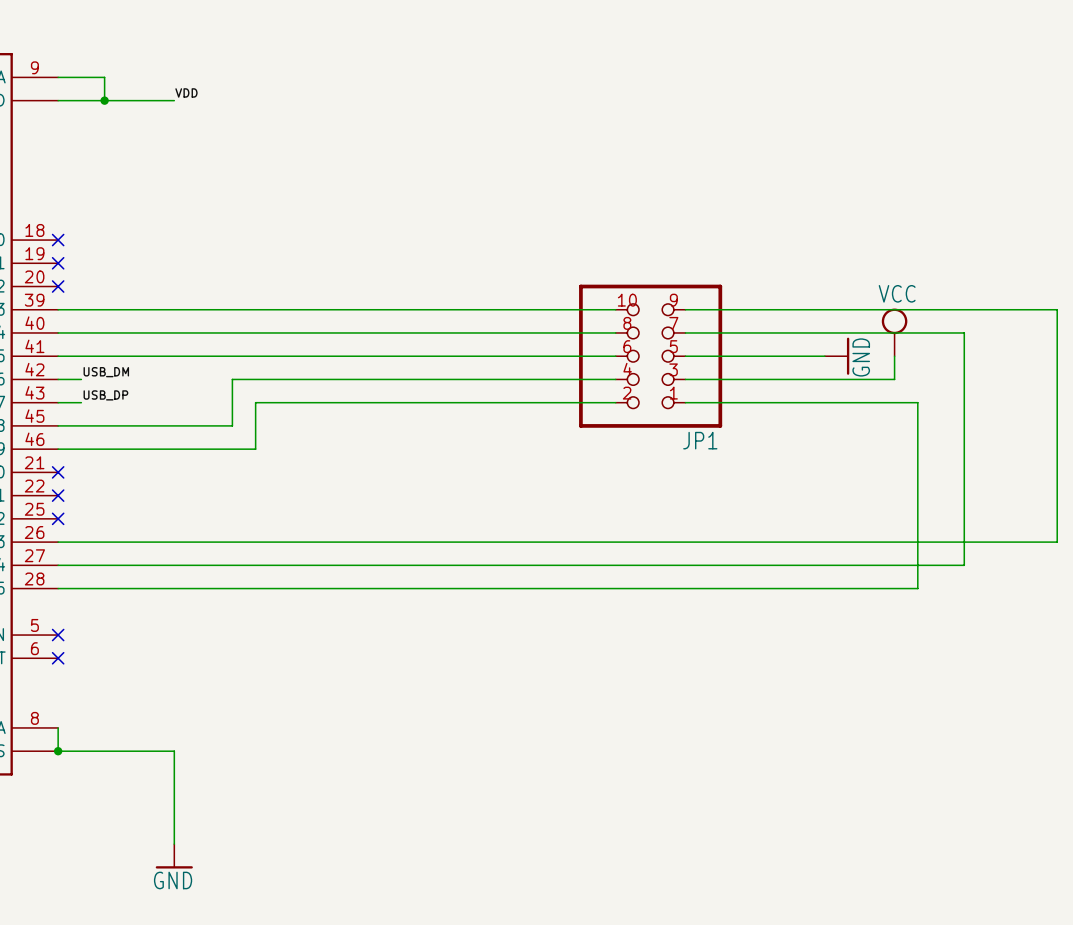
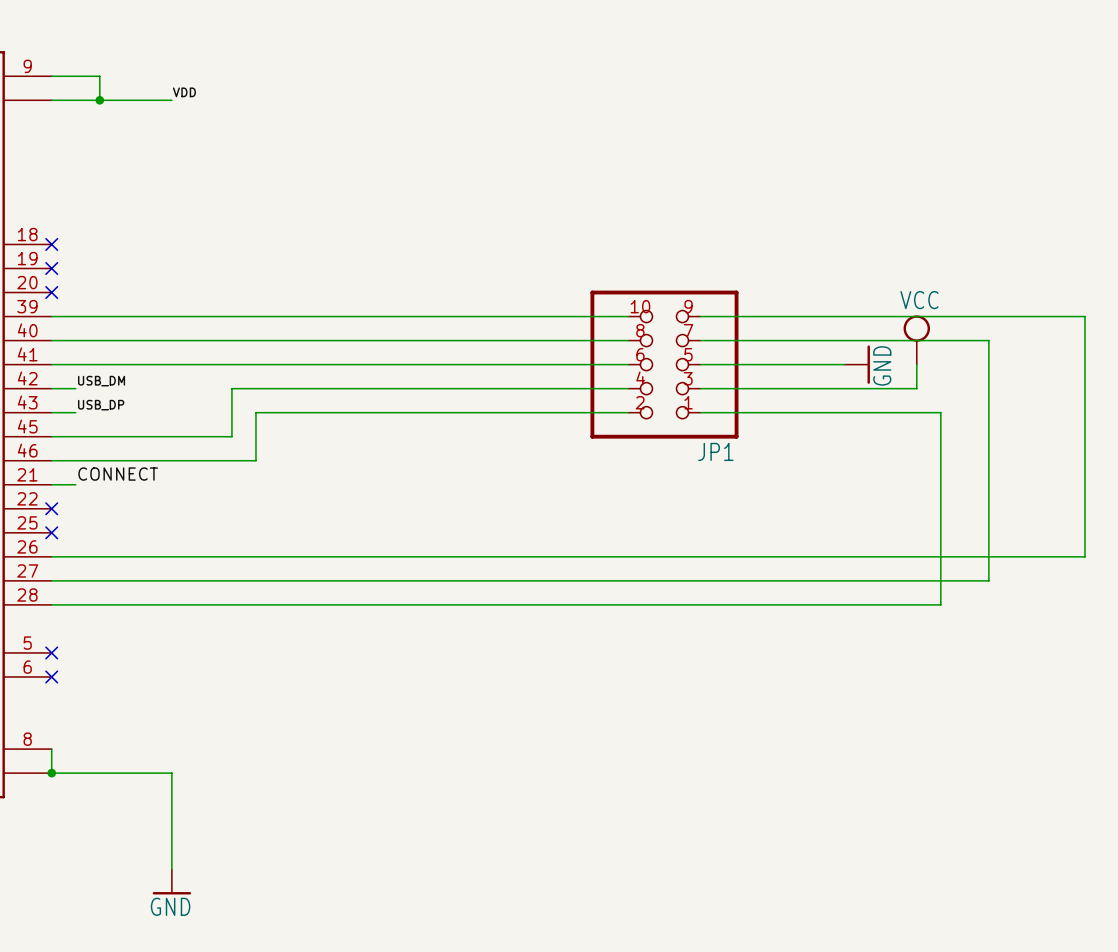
label: none -> CONNECT (118, 474)
wire: none -> (51, 484) (75, 484)
no-connect mark: (58, 472) -> none

